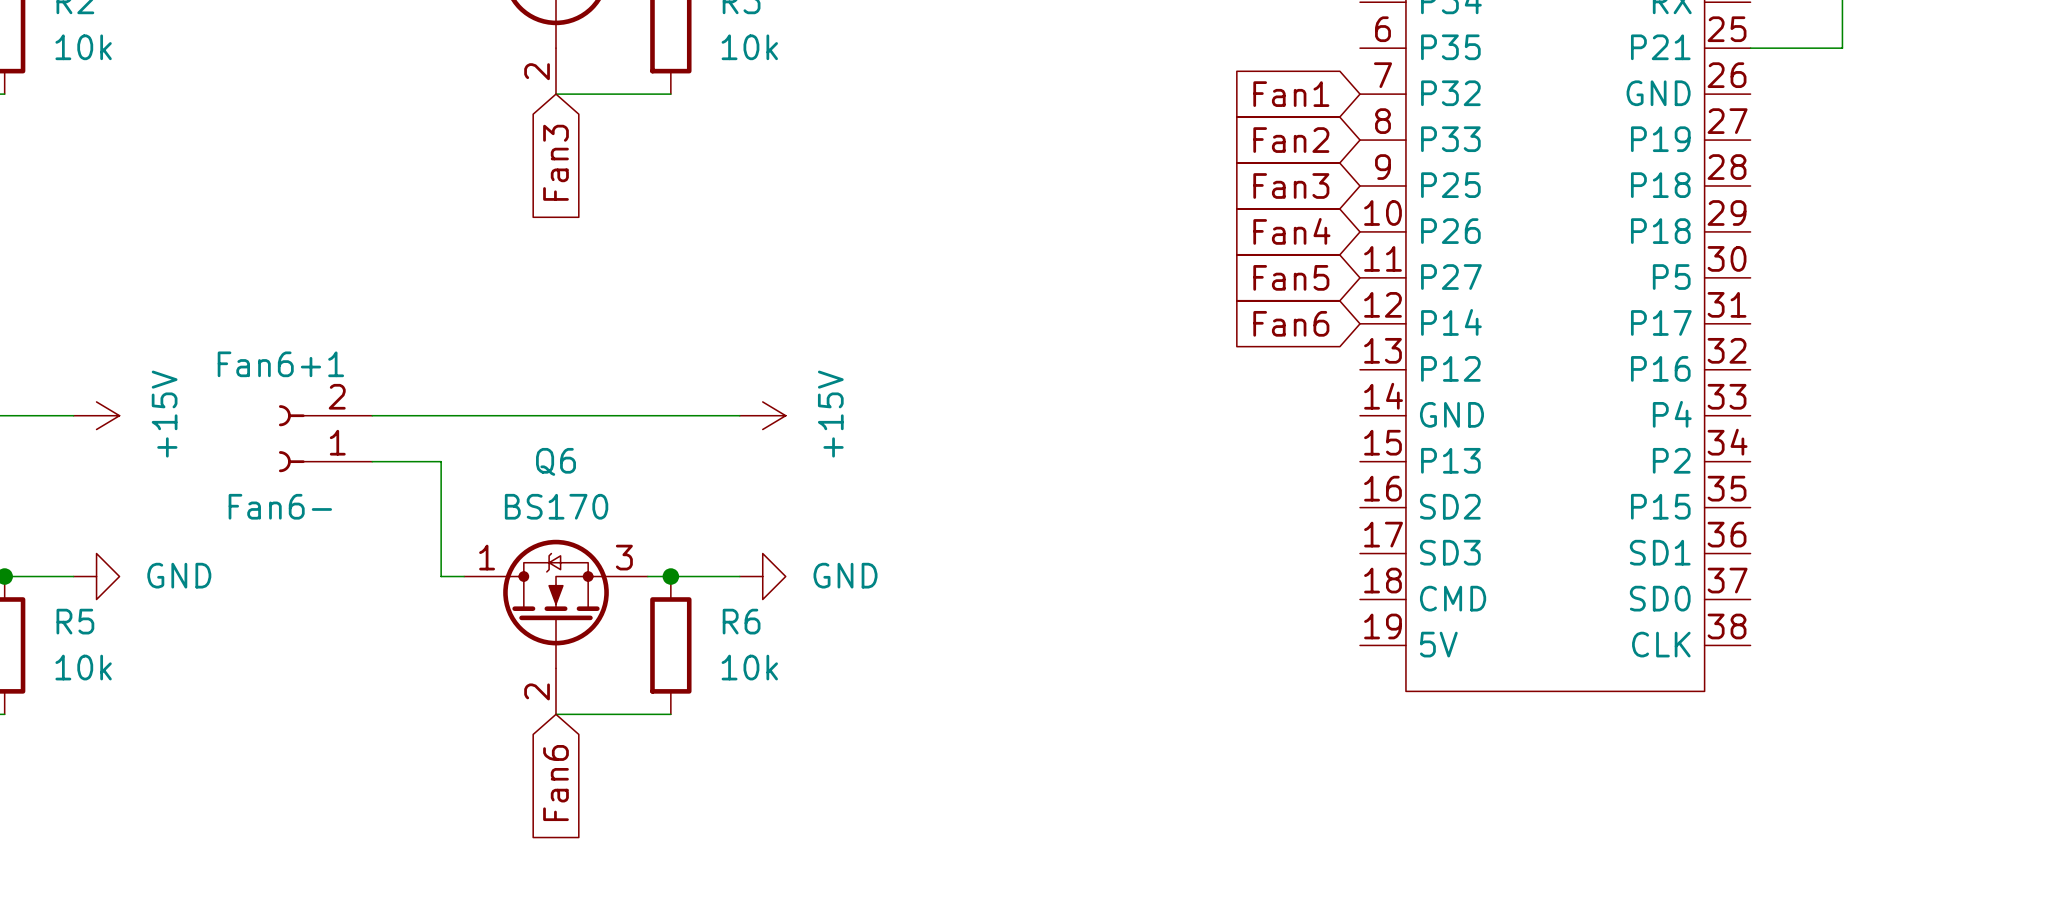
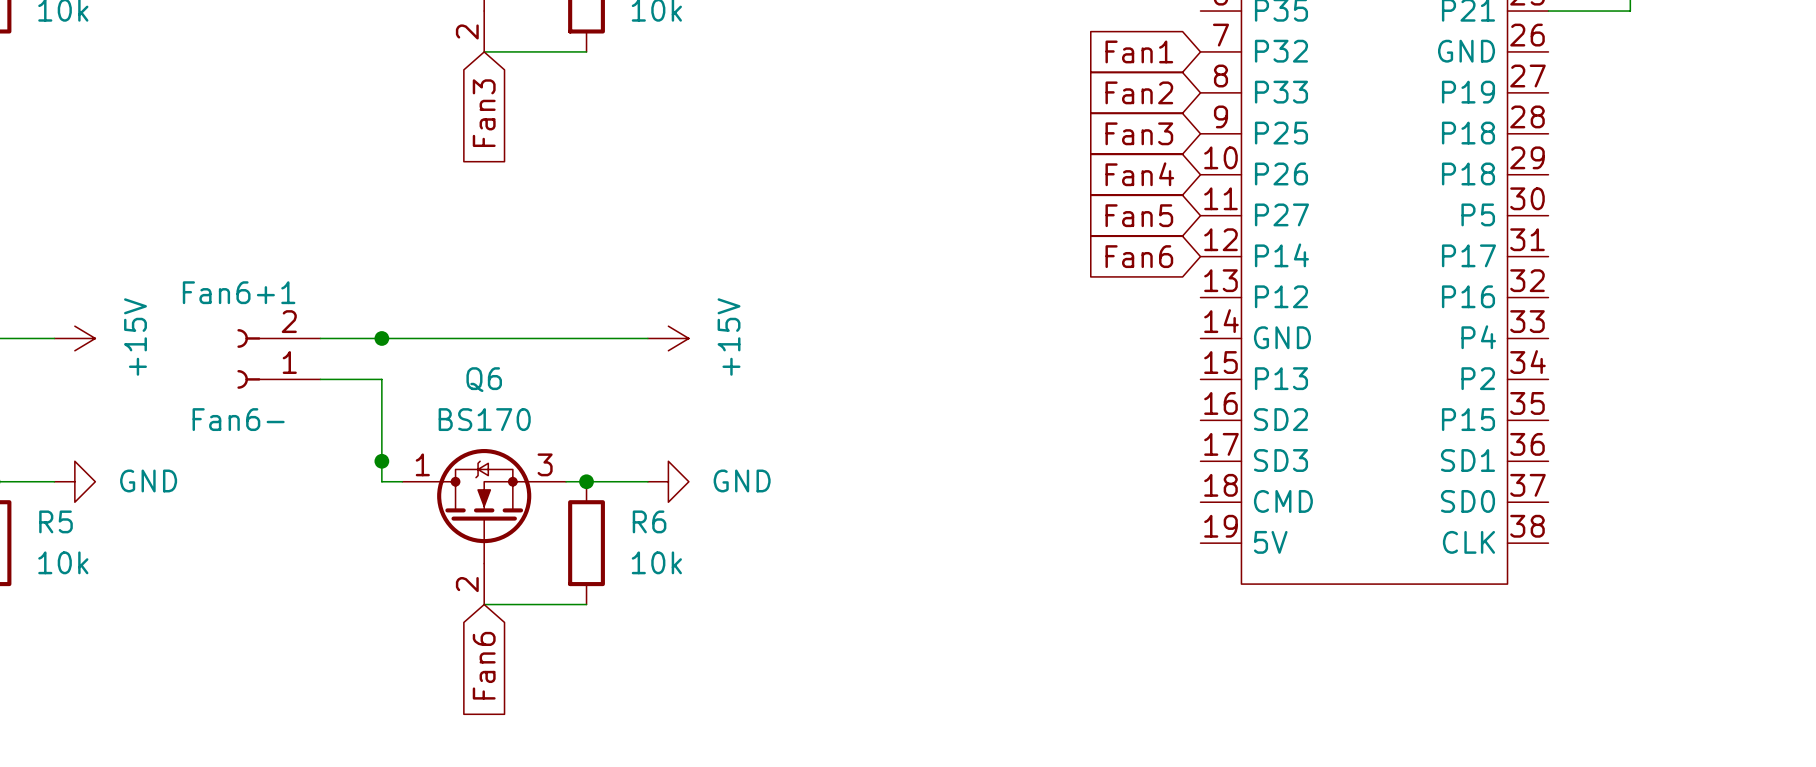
junction: none -> (381, 338)
junction: none -> (381, 461)

